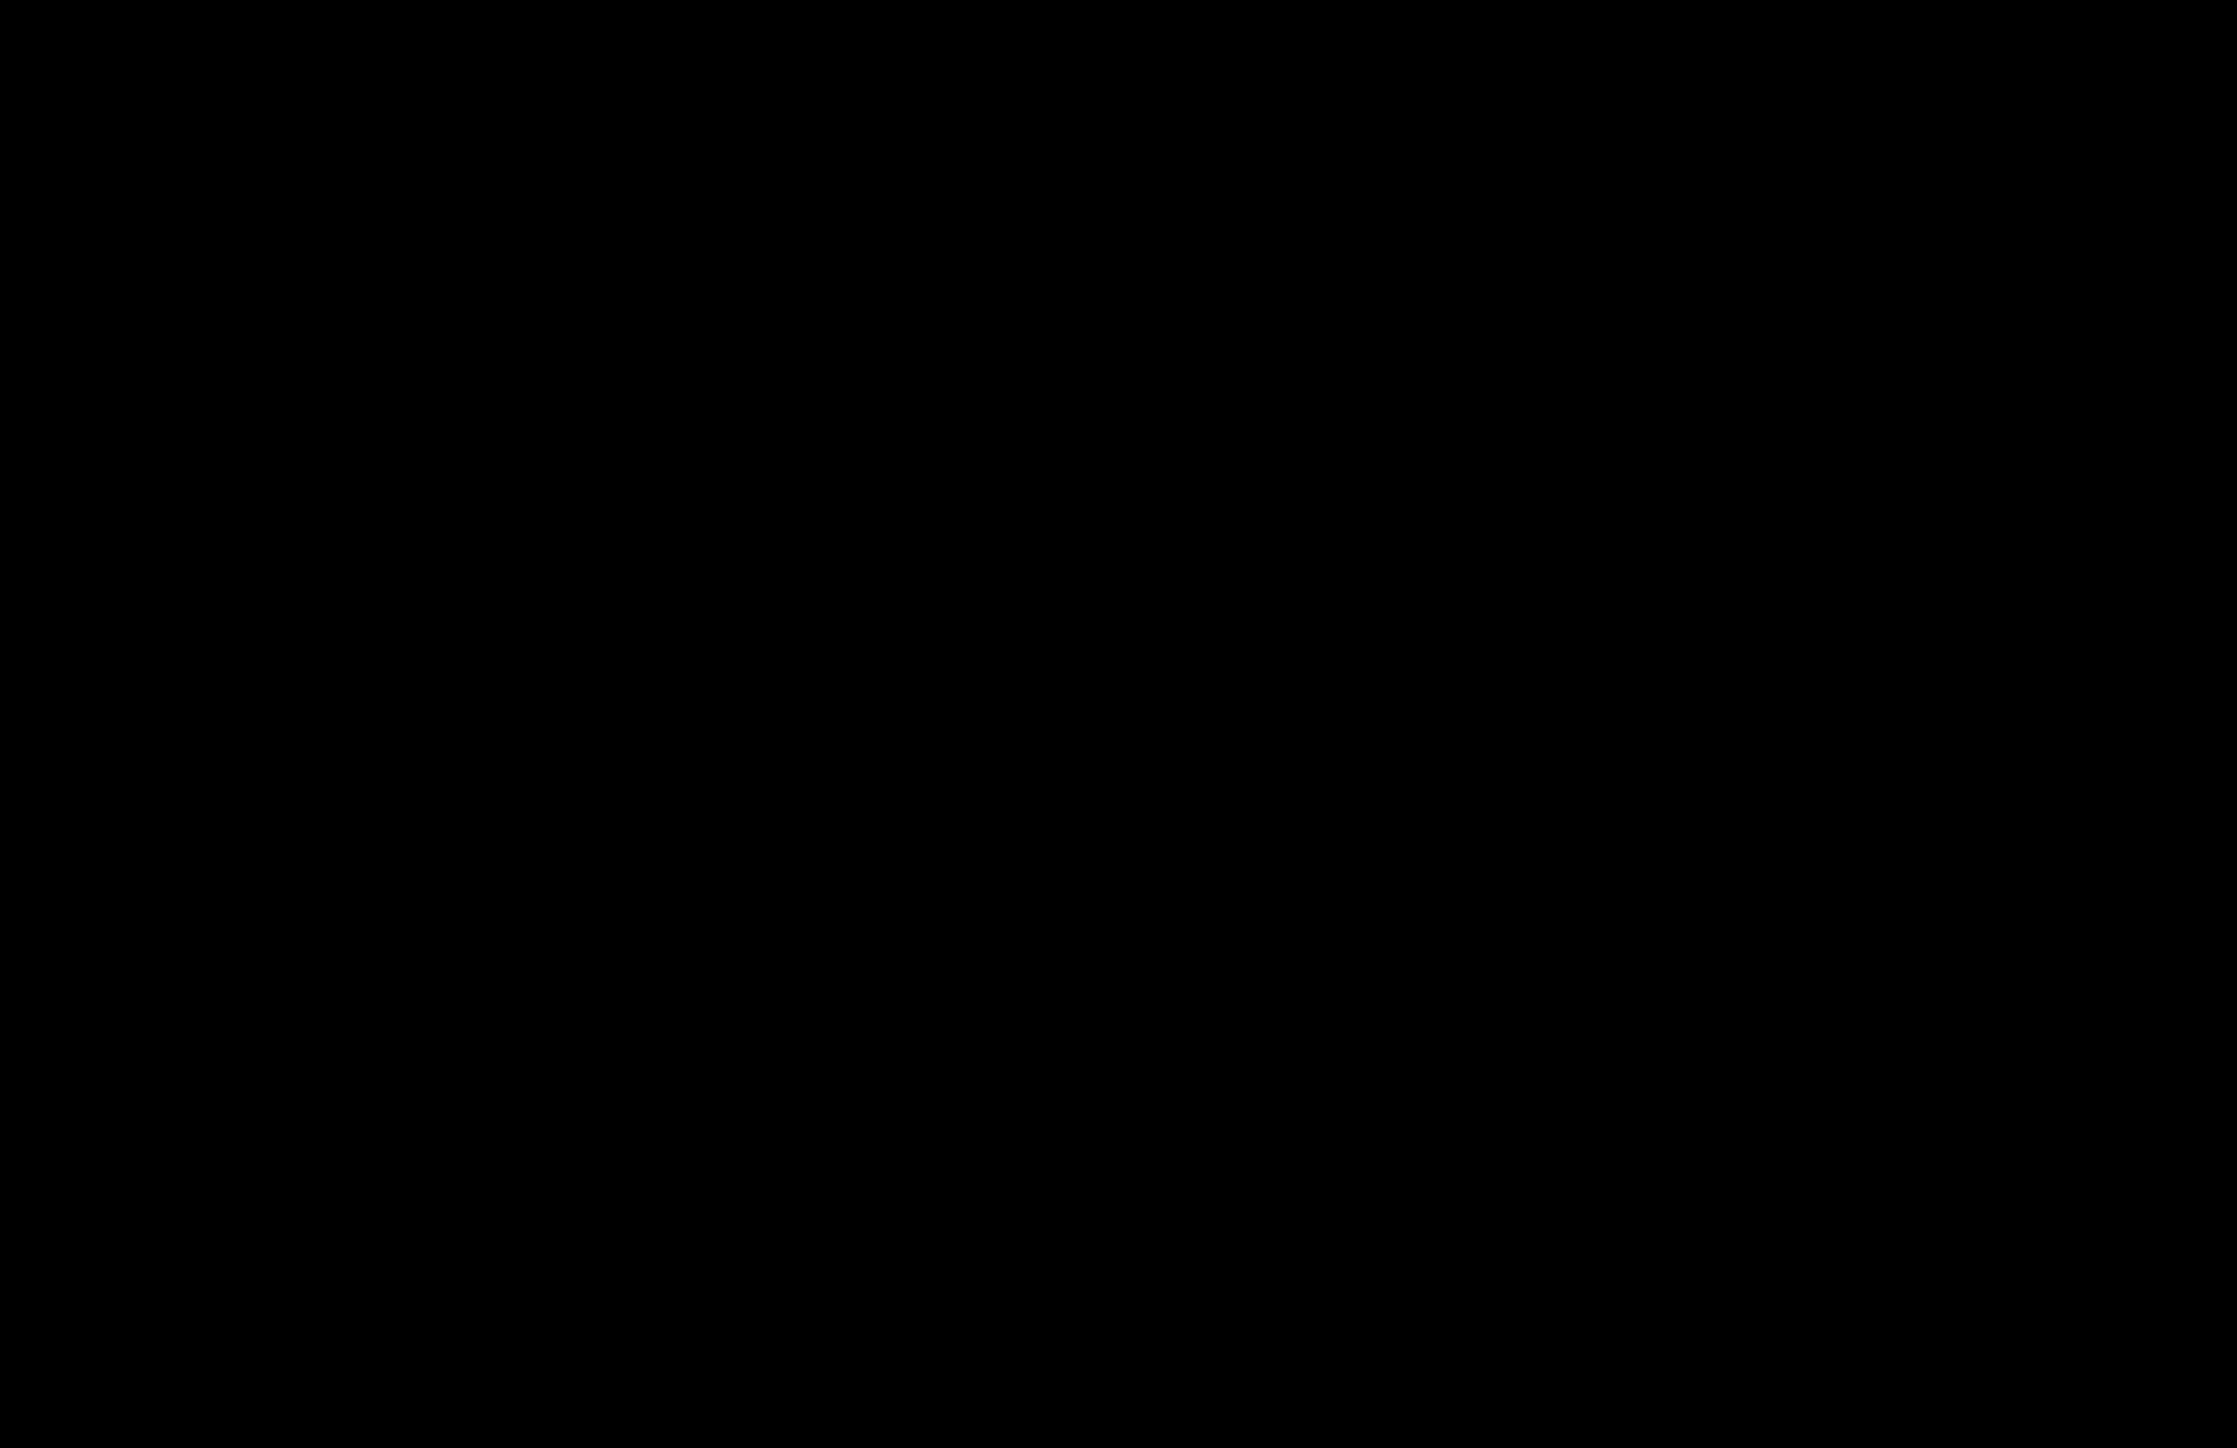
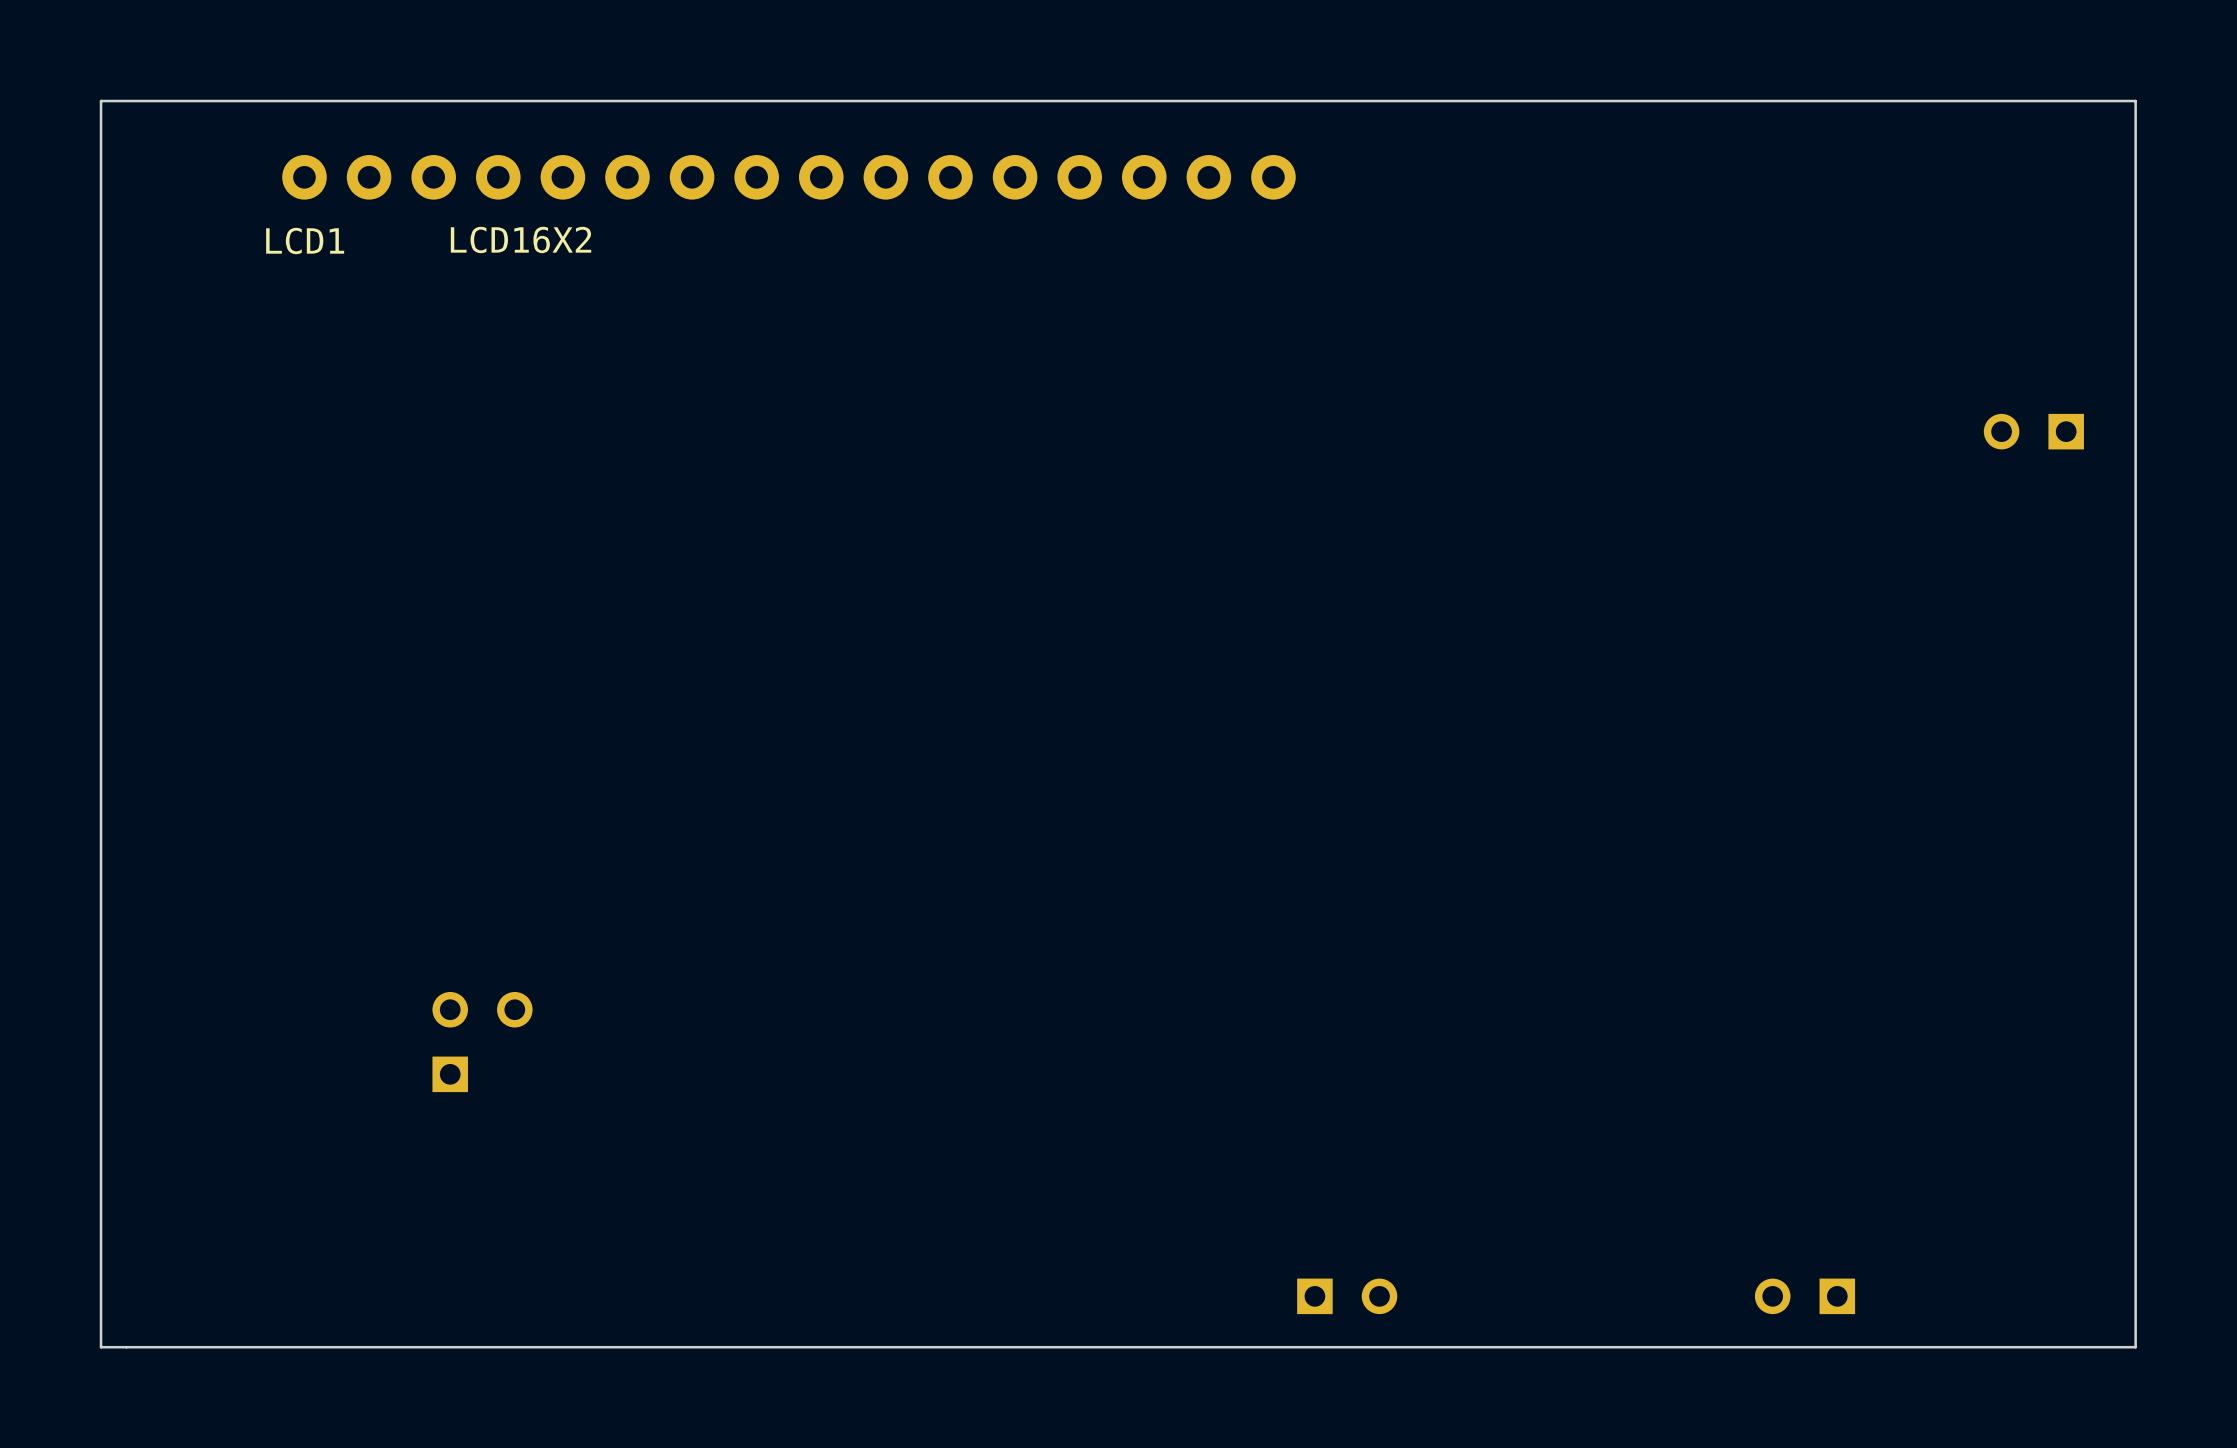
board edge: none -> (2135, 101) (2135, 1347) (101, 1347) (101, 101) (2135, 101)
LCD1: none -> LCD16X2 (788, 177)
part: none -> (2033, 431)
part: none -> (482, 1042)
part: none -> (1347, 1296)
part: none -> (1805, 1296)

